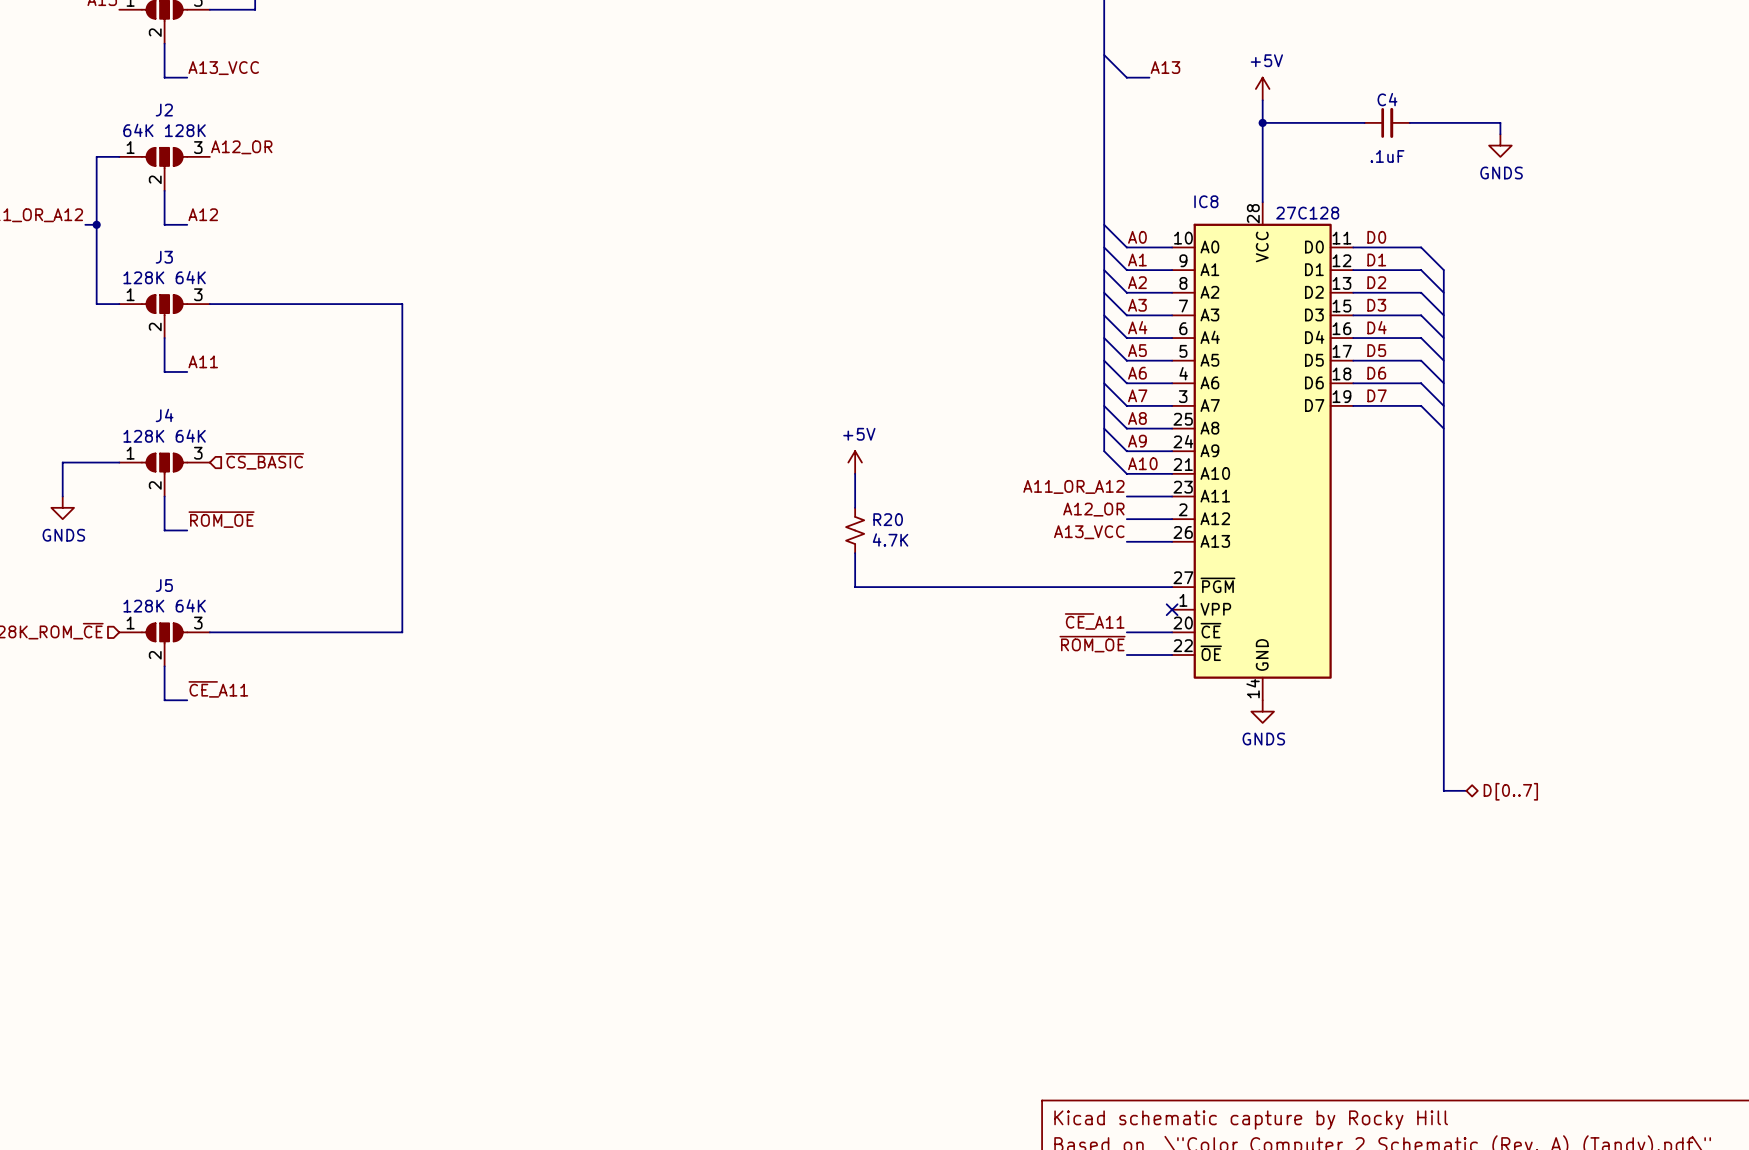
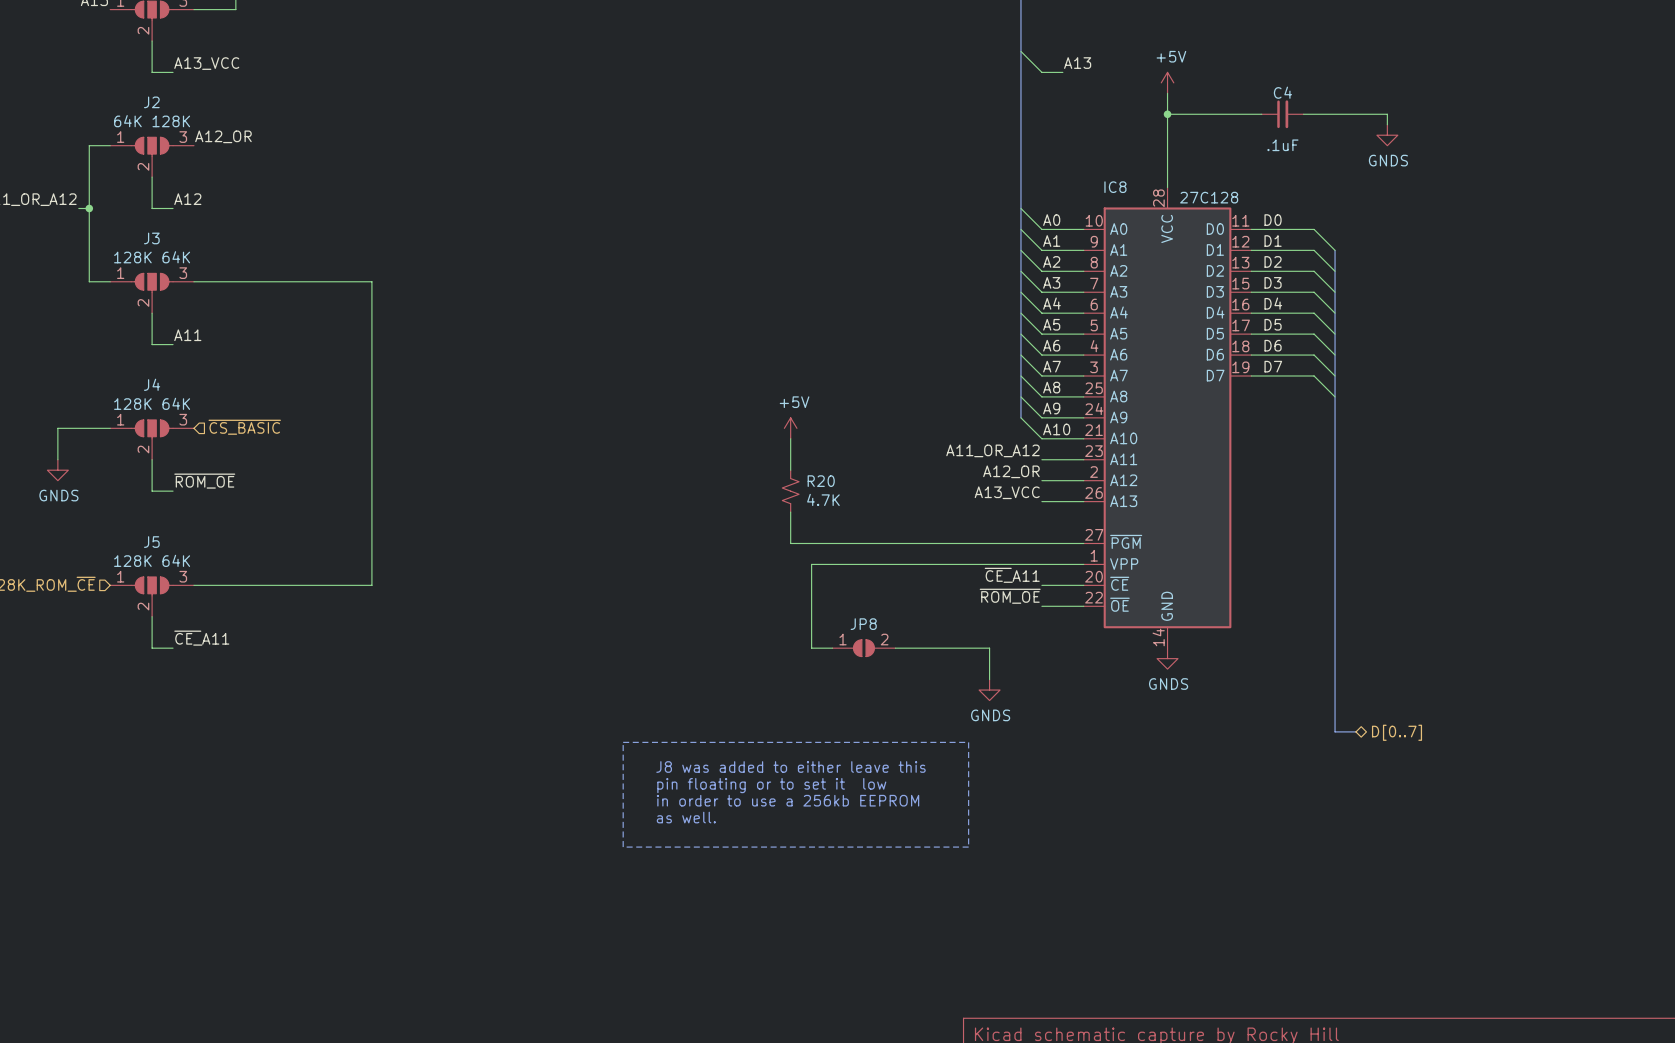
wire: none -> (1083, 564) (811, 564) (811, 648) (832, 648)
no-connect mark: (1172, 609) -> none
JP8: none -> (863, 648)
wire: none -> (895, 648) (989, 648) (989, 679)
power symbol: none -> GNDS (989, 690)
line: none -> (623, 742) (968, 742) (968, 847) (623, 847) (623, 742)
text: none -> J8 was added to either leave this (791, 766)
text: none -> pin floating or to set it low (771, 785)
text: none -> in order to use a 256kb EEPROM (788, 800)
text: none -> as well. (686, 817)

